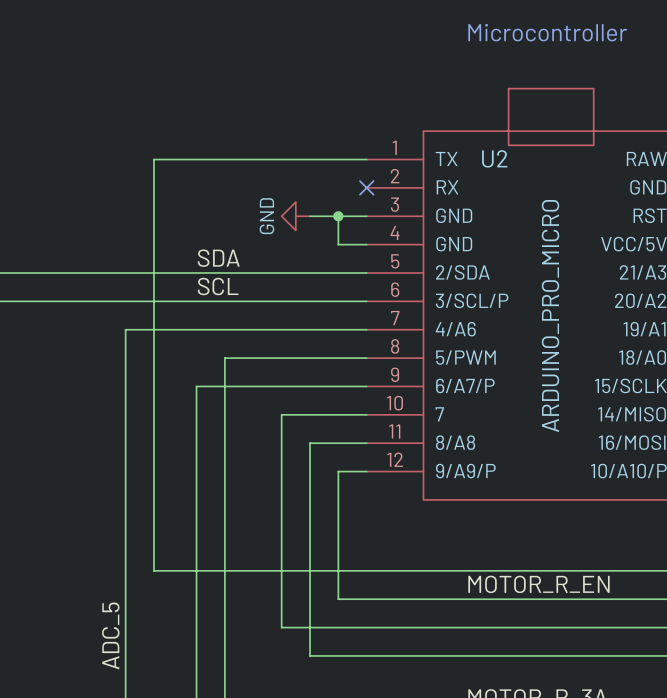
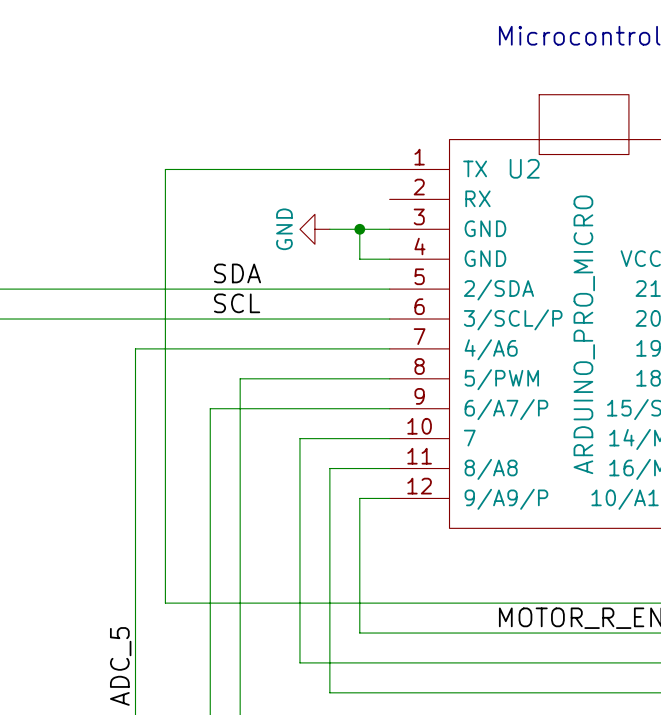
no-connect mark: (366, 187) -> none

